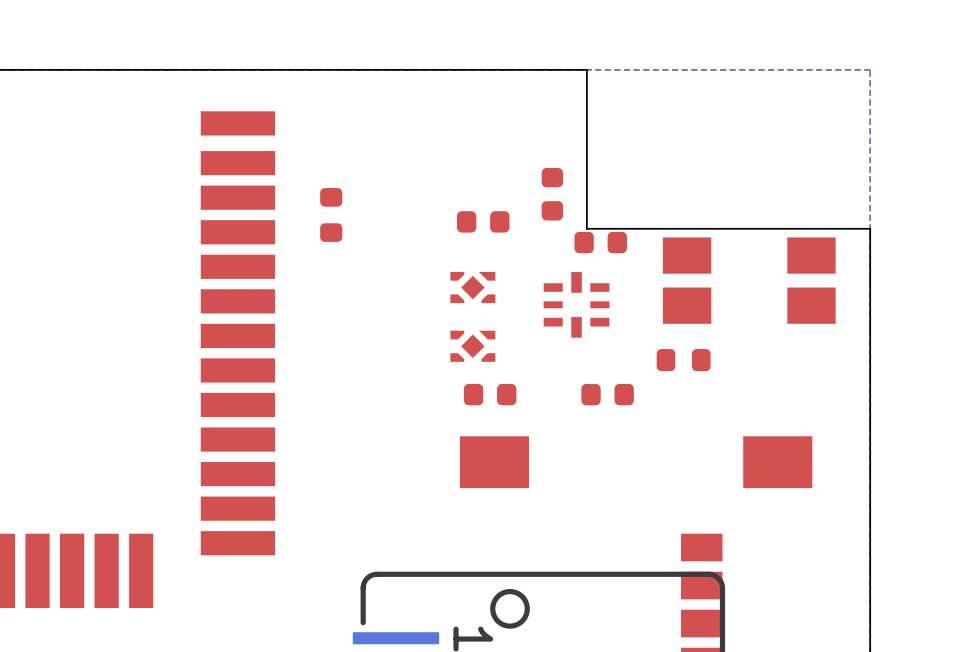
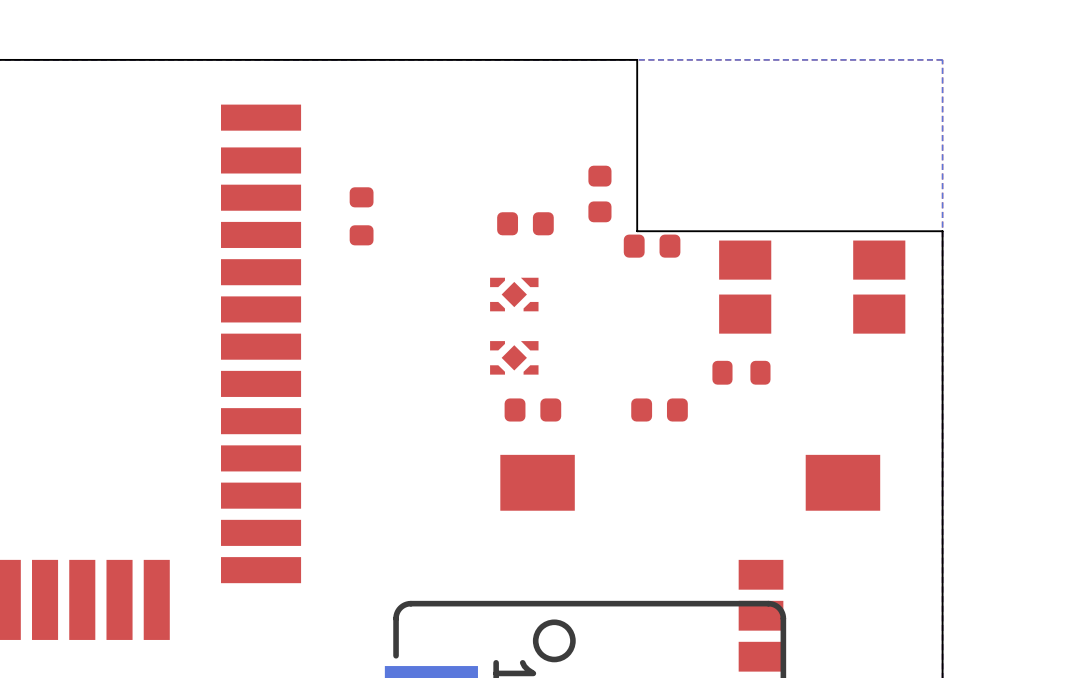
part: (576, 304) -> none

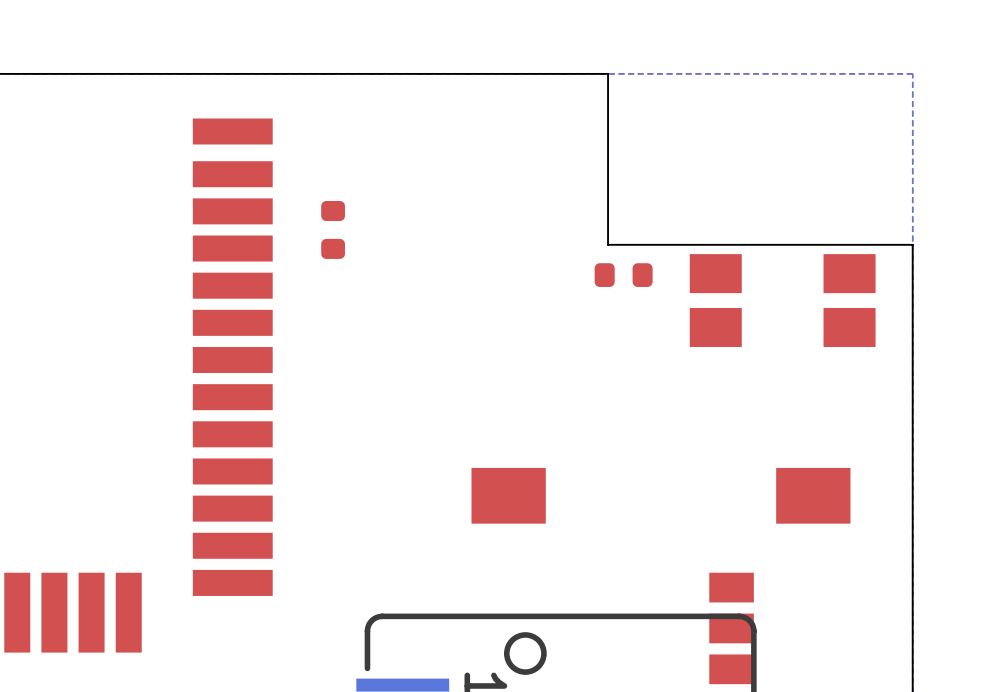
part: (599, 193) -> none
part: (525, 223) -> none
part footprint: [623, 234, 681, 258] -> [594, 263, 653, 287]
part: (514, 294) -> none
part: (514, 357) -> none
part: (741, 372) -> none
part: (532, 409) -> none
part: (659, 409) -> none

